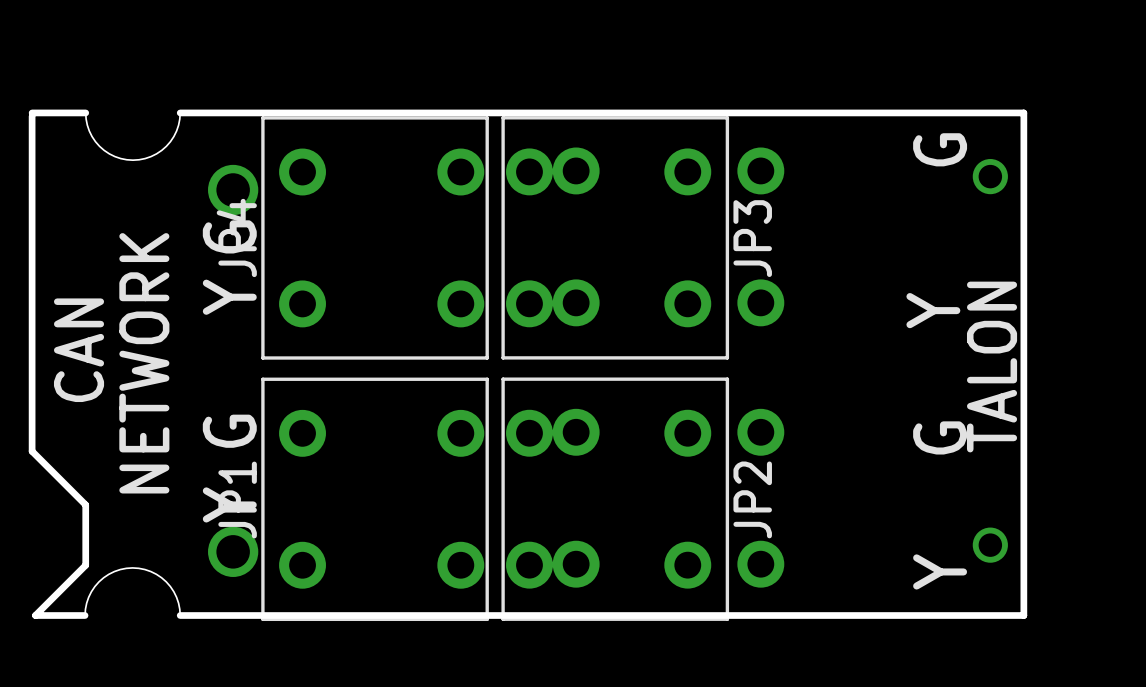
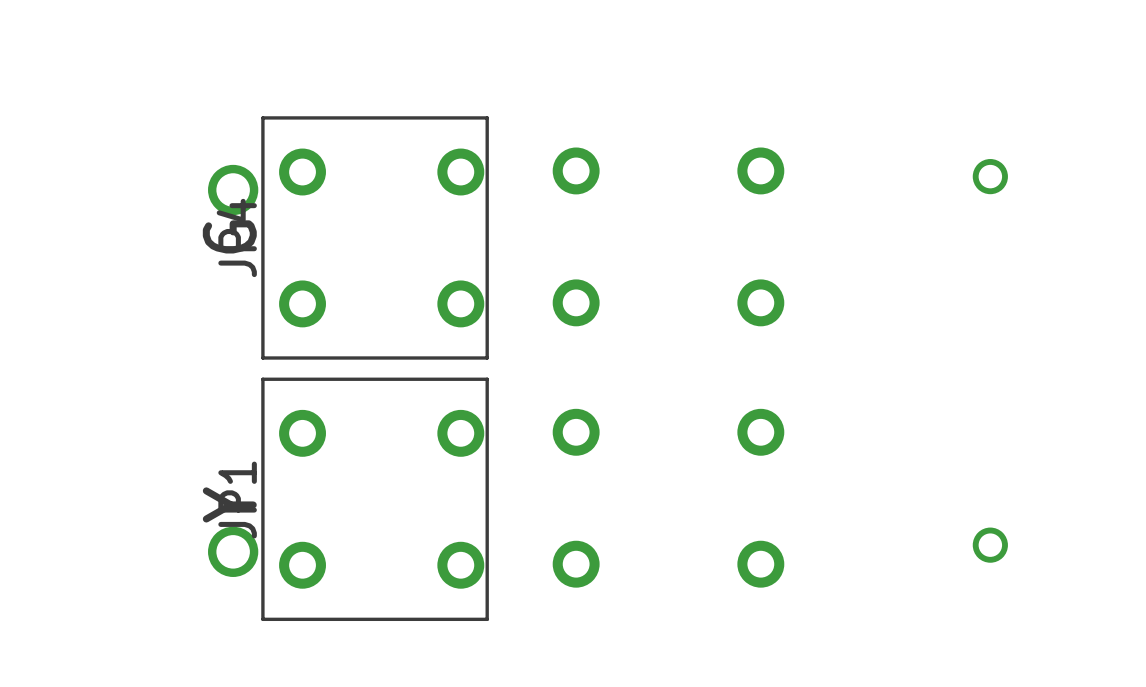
board edge: (32, 112) (85, 112) (89, 131) (99, 146) (114, 156) (132, 160) (151, 156) (166, 146) (176, 131) (180, 112) (1023, 112) (1023, 615) (180, 615) (176, 597) (166, 581) (150, 571) (132, 567) (114, 571) (98, 581) (88, 597) (85, 615) (35, 615) (85, 565) (85, 504) (32, 451) (32, 112) -> none
text: G (940, 149) -> none
JP3: (615, 237) -> none
text: Y (229, 297) -> none
text: Y (933, 310) -> none
text: CAN (79, 350) -> none
text: NETWORK (144, 363) -> none
text: TALON (992, 367) -> none
text: G (229, 431) -> none
text: G (940, 437) -> none
JP2: (615, 499) -> none
text: Y (940, 571) -> none

